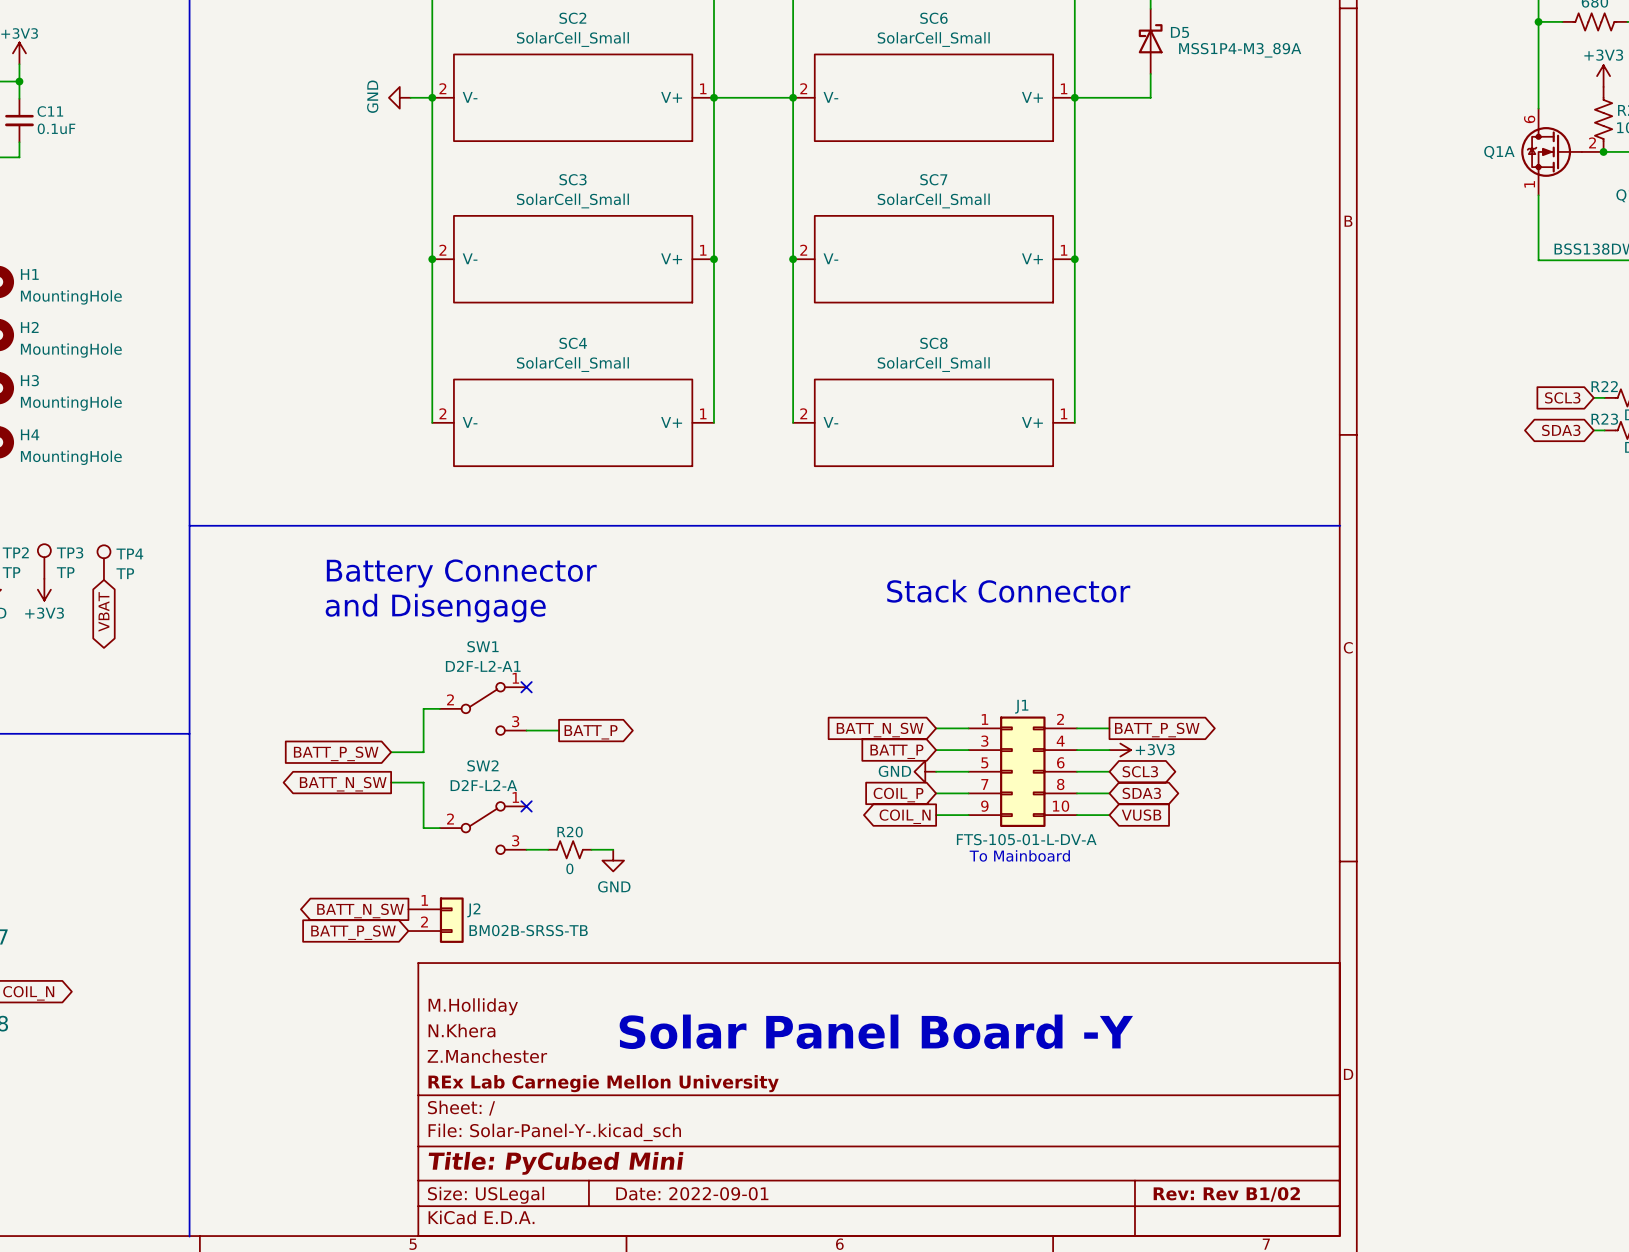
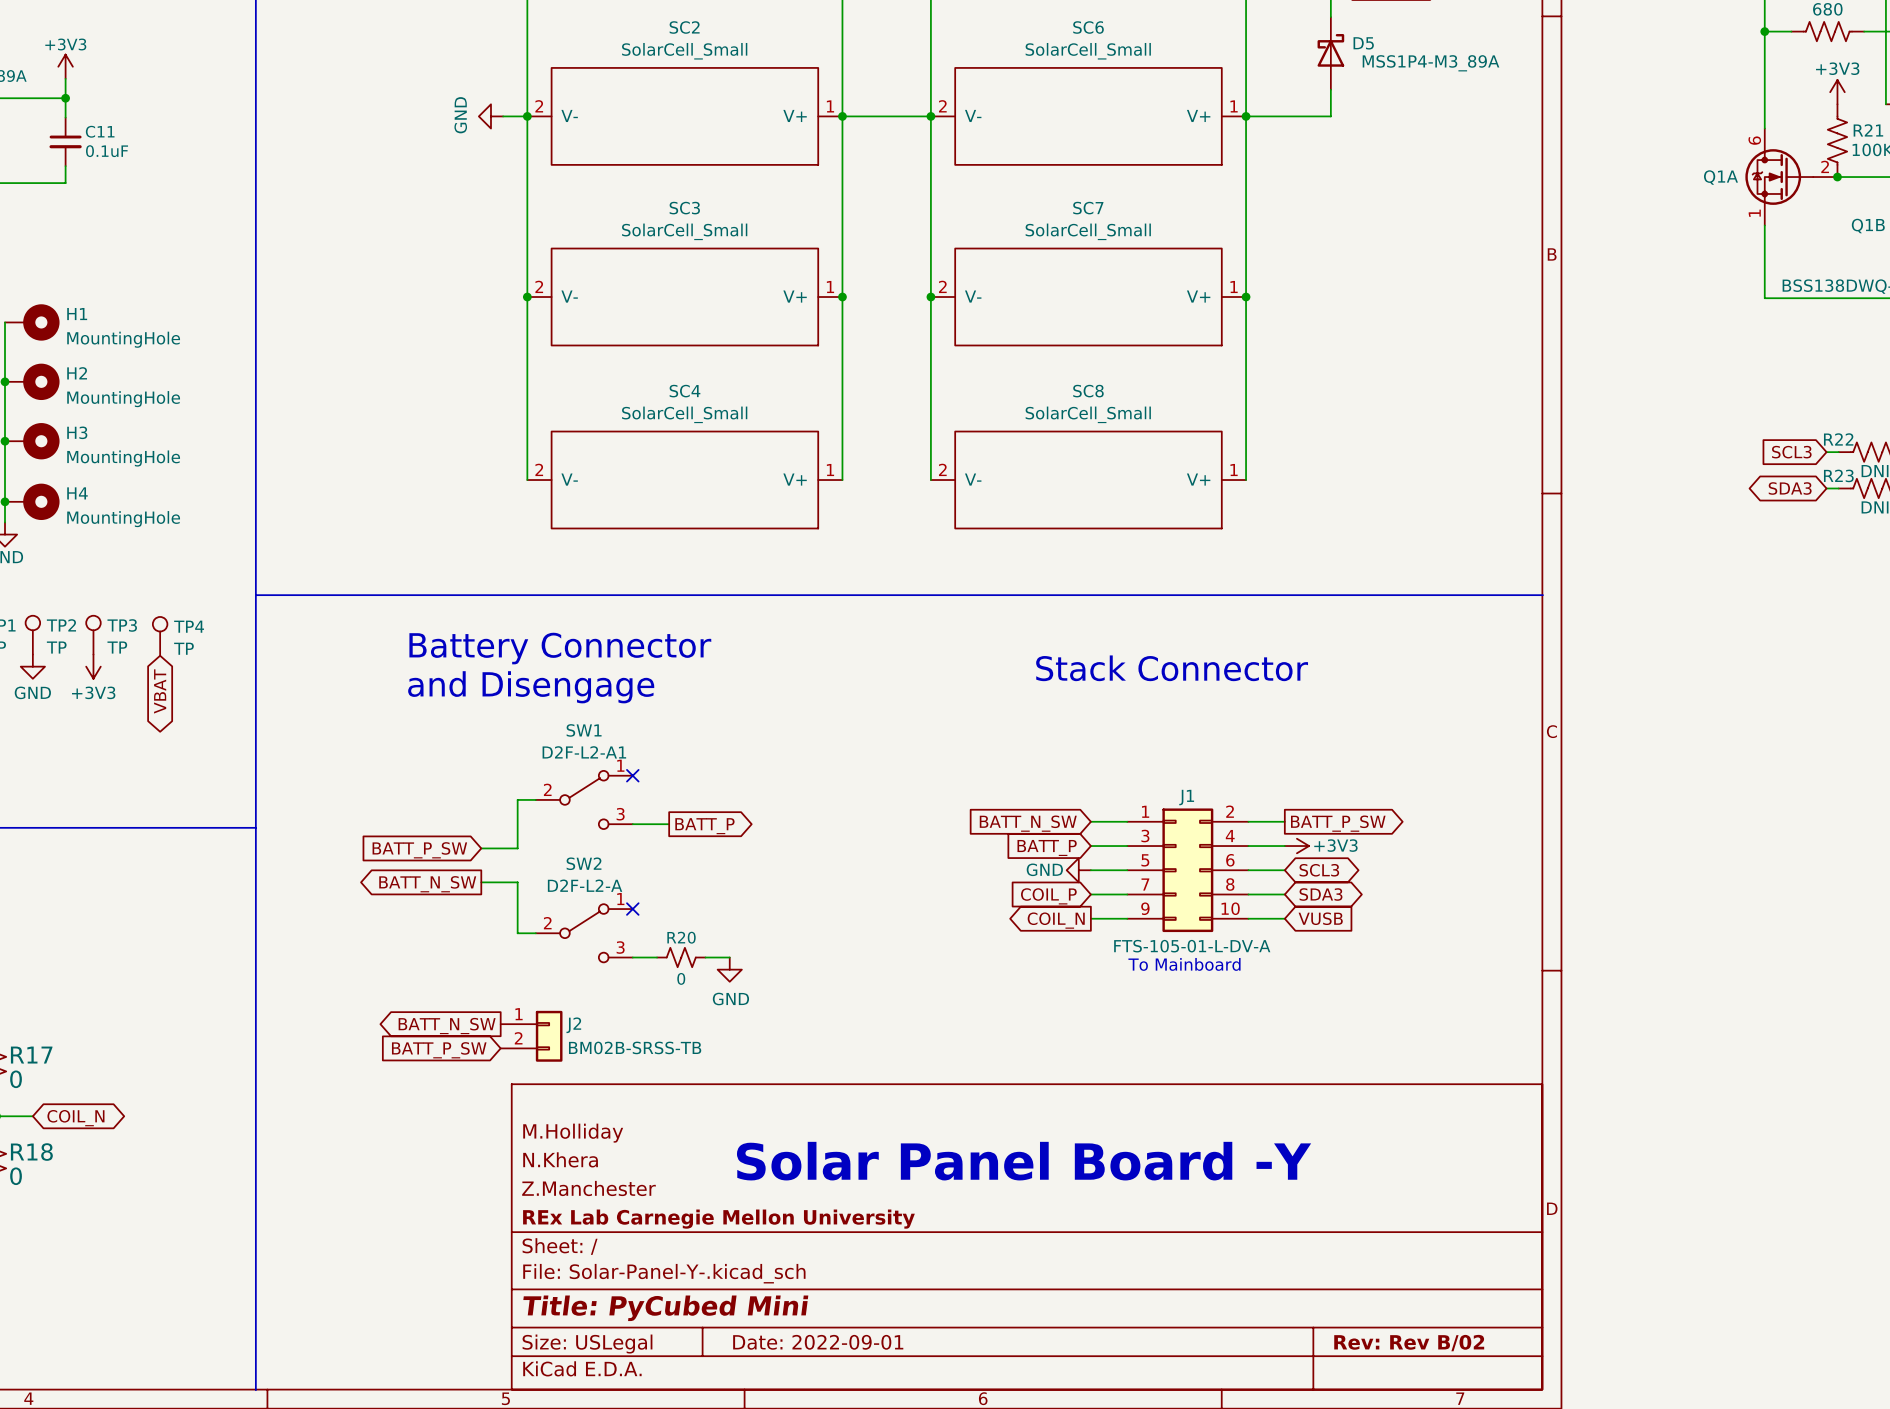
title block: Rev: Rev B1/02 (1226, 1194) -> Rev: Rev B/02 (1409, 1343)

